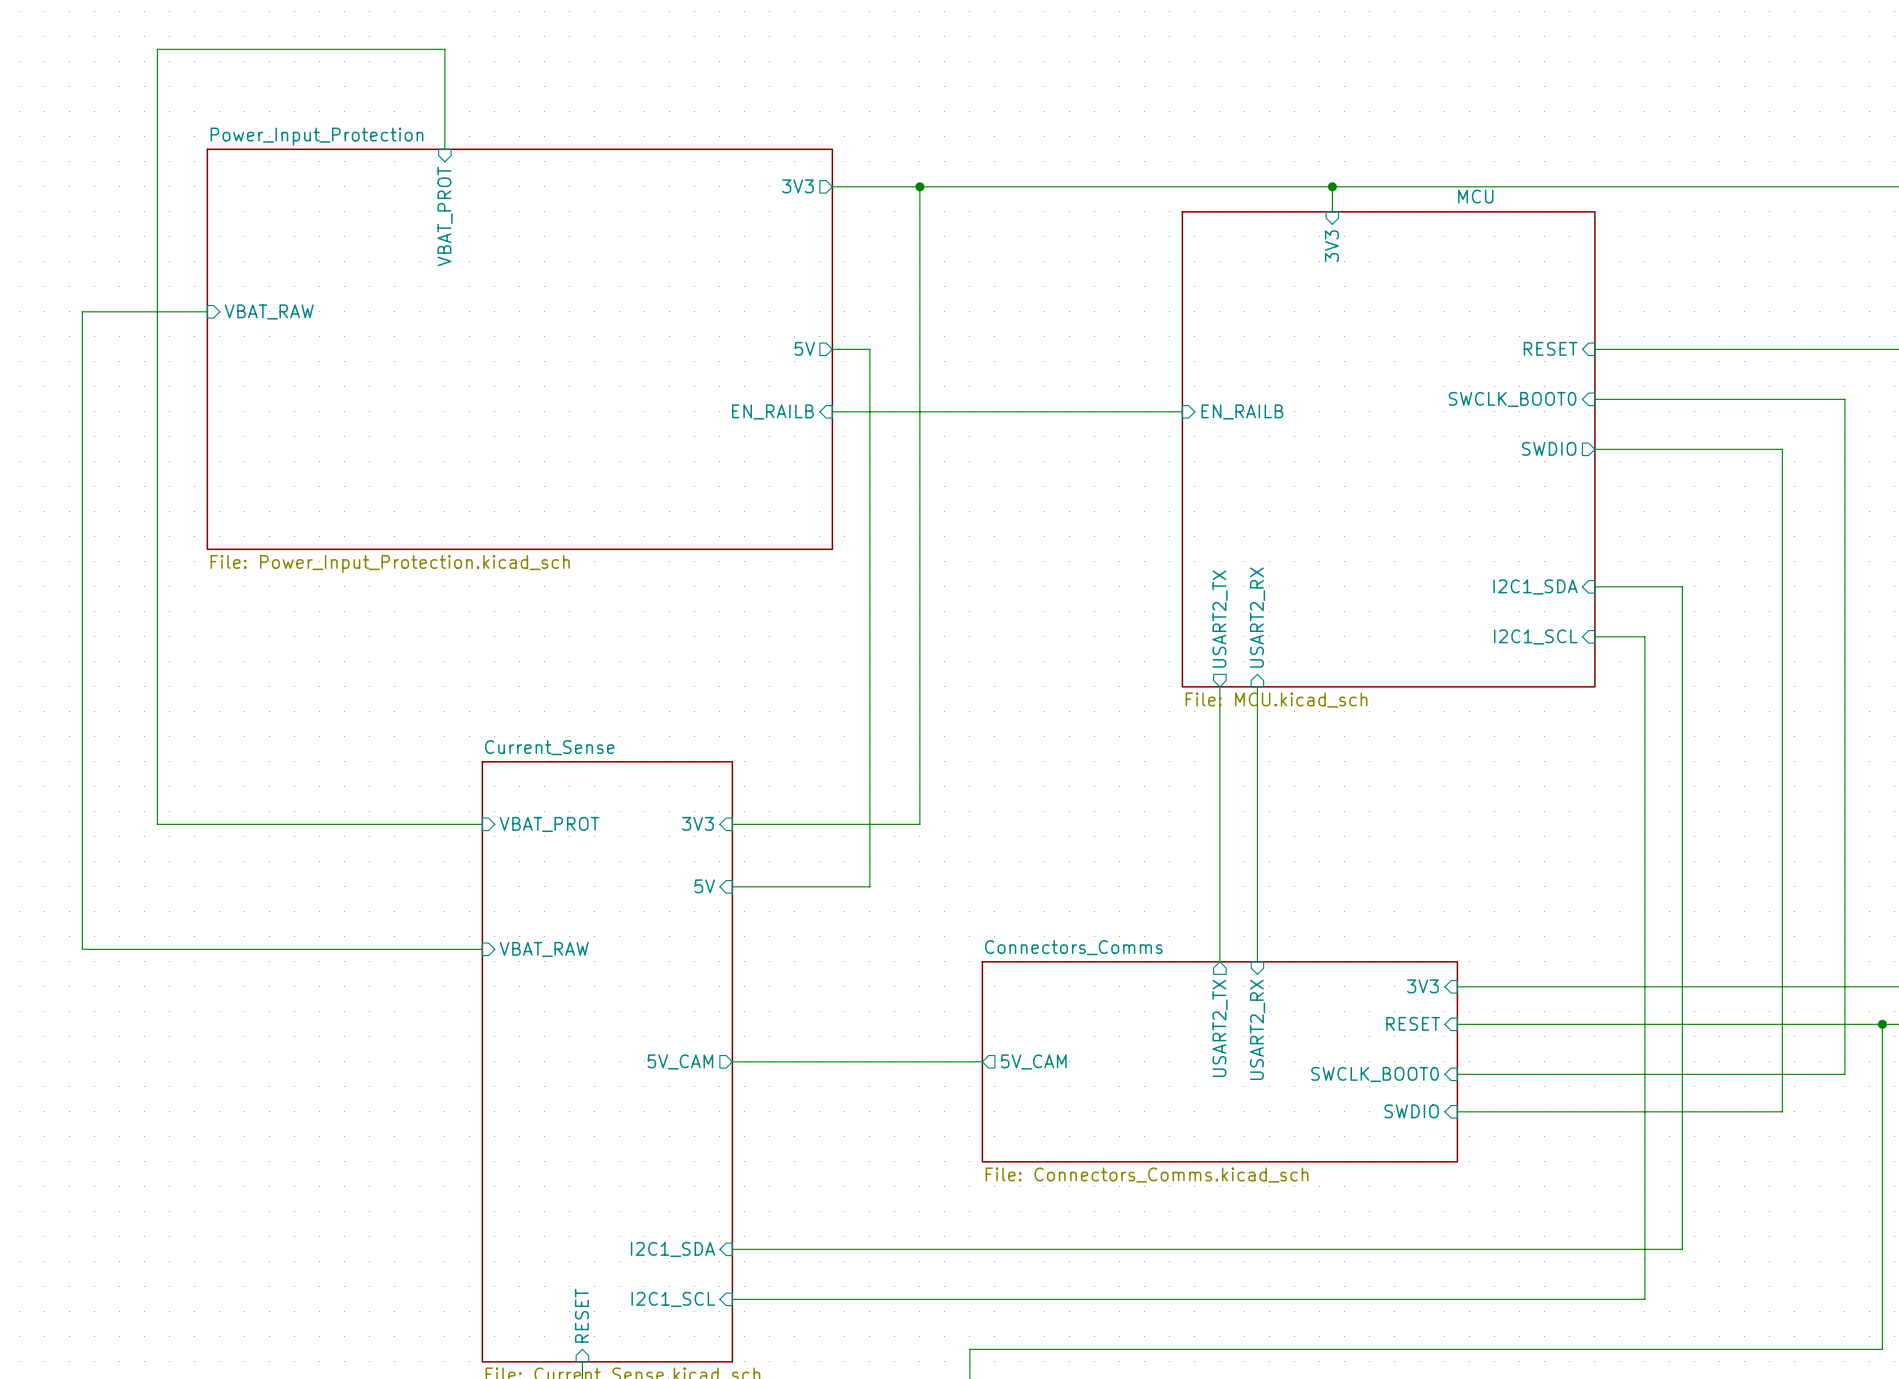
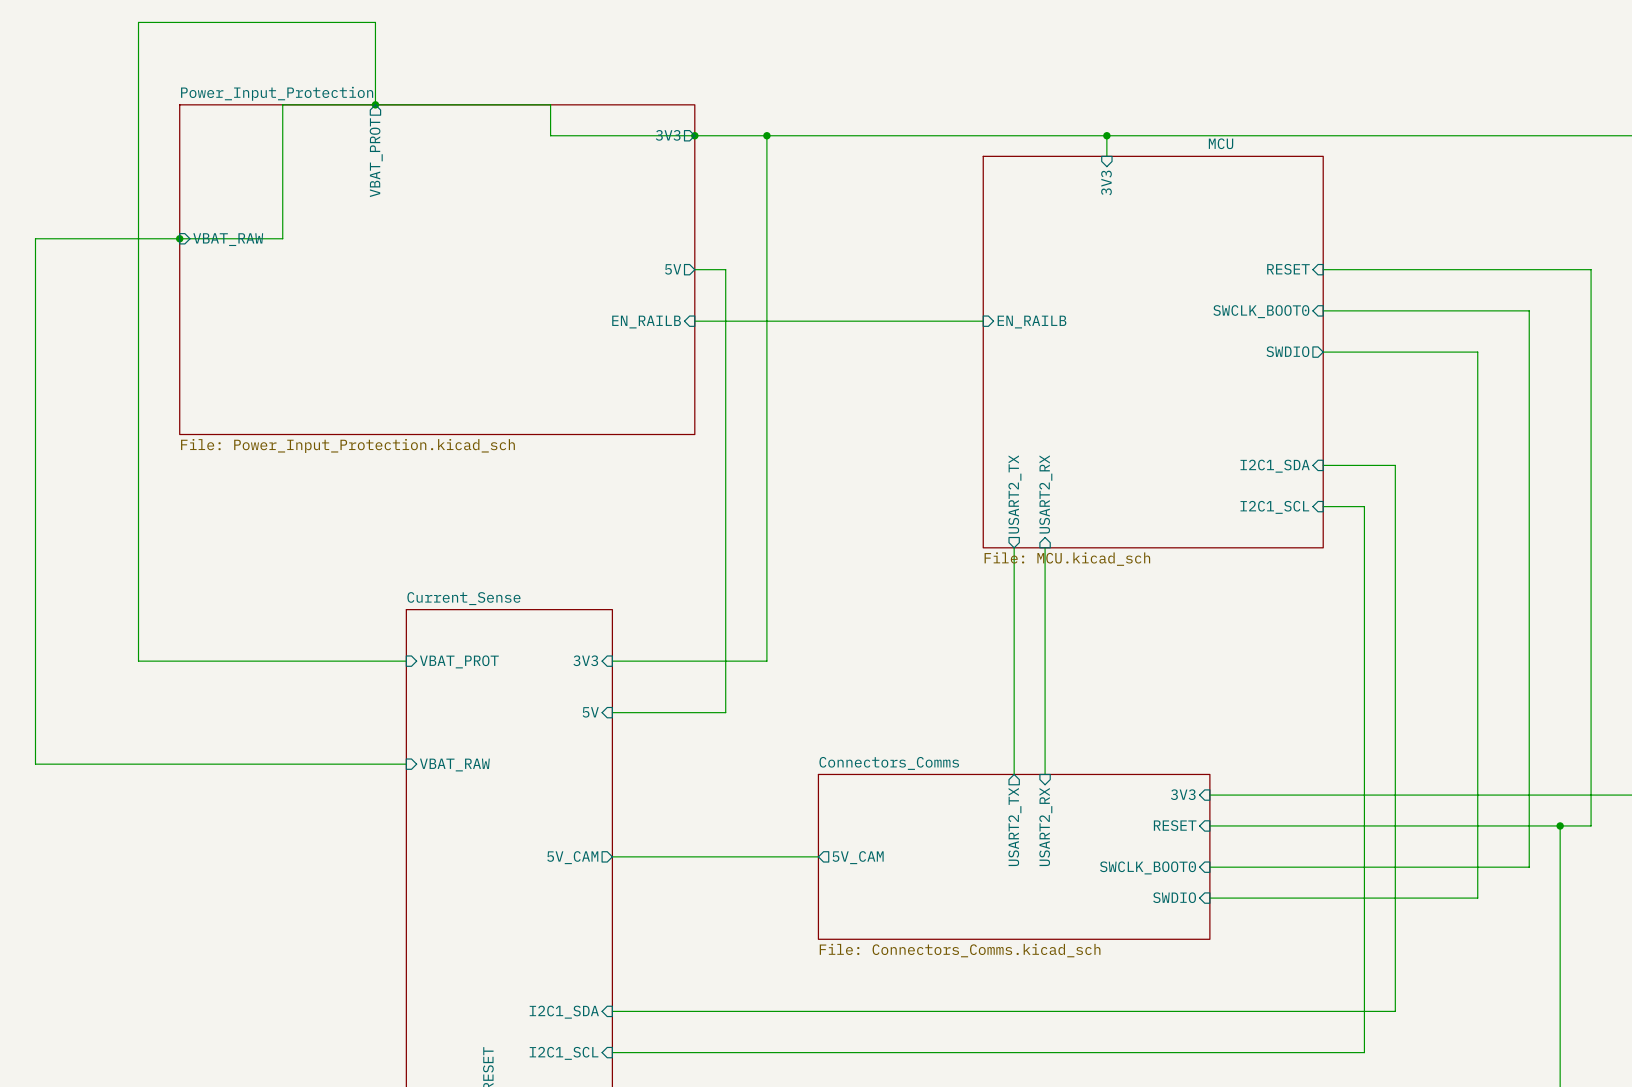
junction: none -> (375, 104)
wire: none -> (694, 135) (550, 135) (550, 104) (282, 104) (282, 238) (179, 238)
junction: none -> (694, 135)
sheet pin shape: input (445, 216) -> output (376, 157)
wire: (82, 311) (82, 949) -> (76, 238) (35, 238) (35, 764) (76, 764)
junction: none -> (179, 238)

